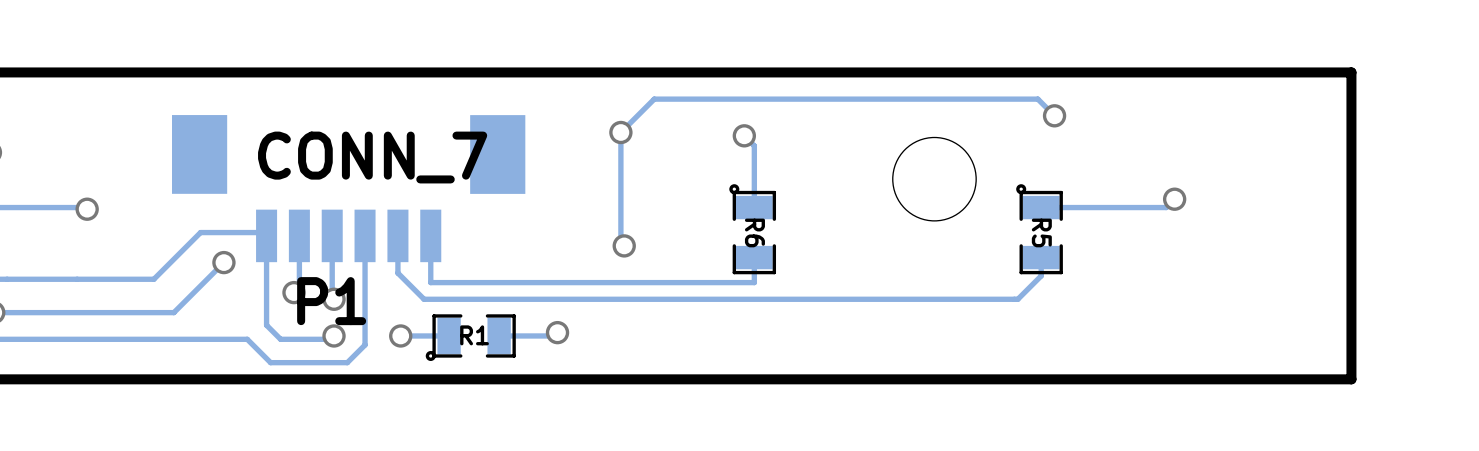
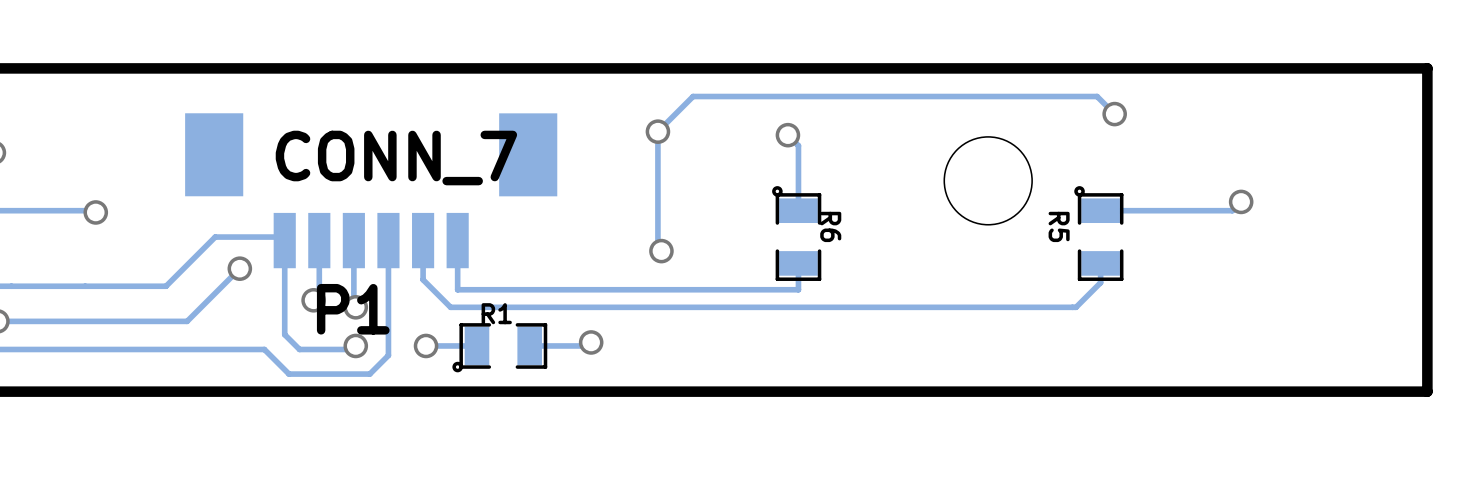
R6 name position: R6 (754, 232) -> R6 (830, 226)
R5 name position: R5 (1041, 232) -> R5 (1059, 226)
R1 name position: R1 (474, 335) -> R1 (496, 313)

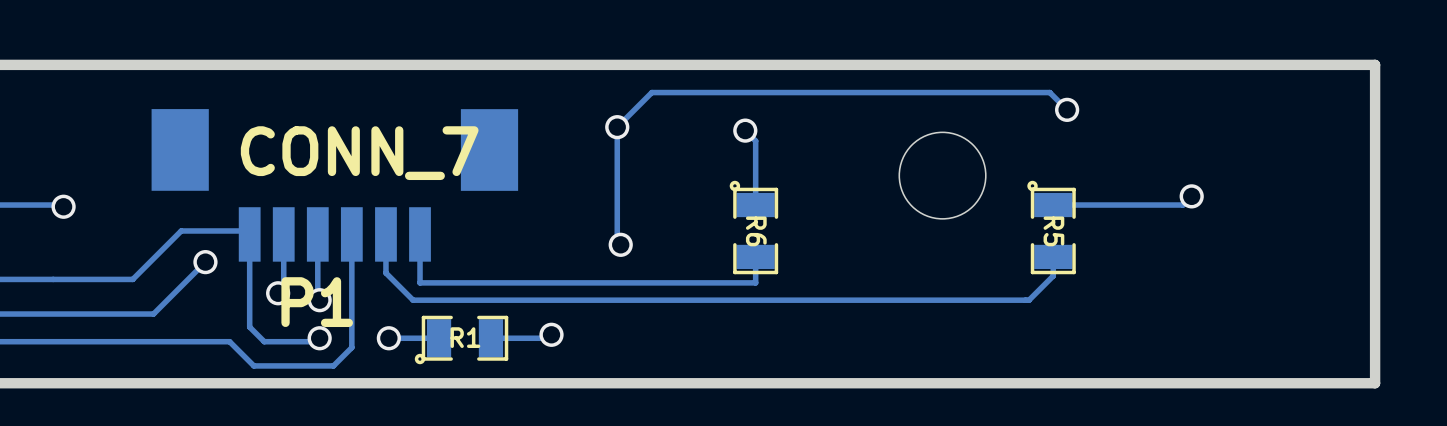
R6 name position: R6 (830, 226) -> R6 (756, 231)
R5 name position: R5 (1059, 226) -> R5 (1053, 231)
R1 name position: R1 (496, 313) -> R1 (465, 337)

